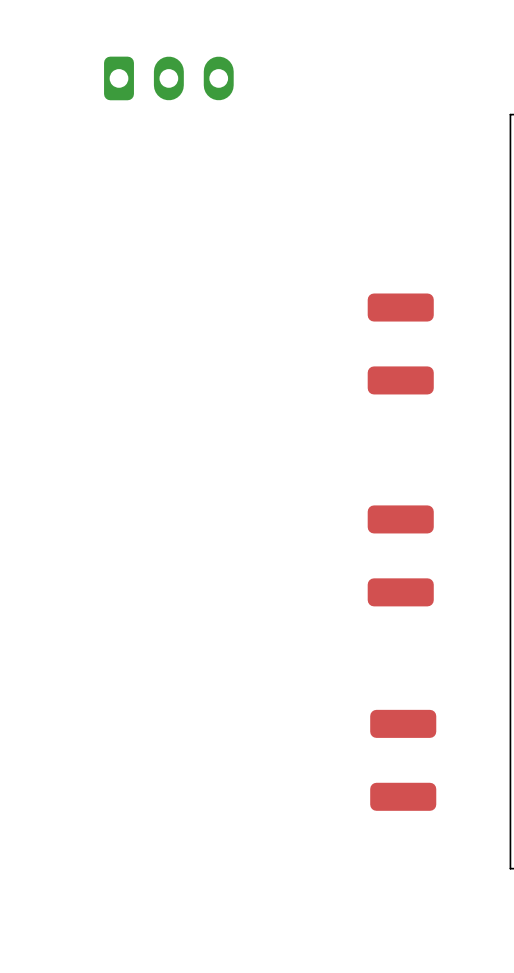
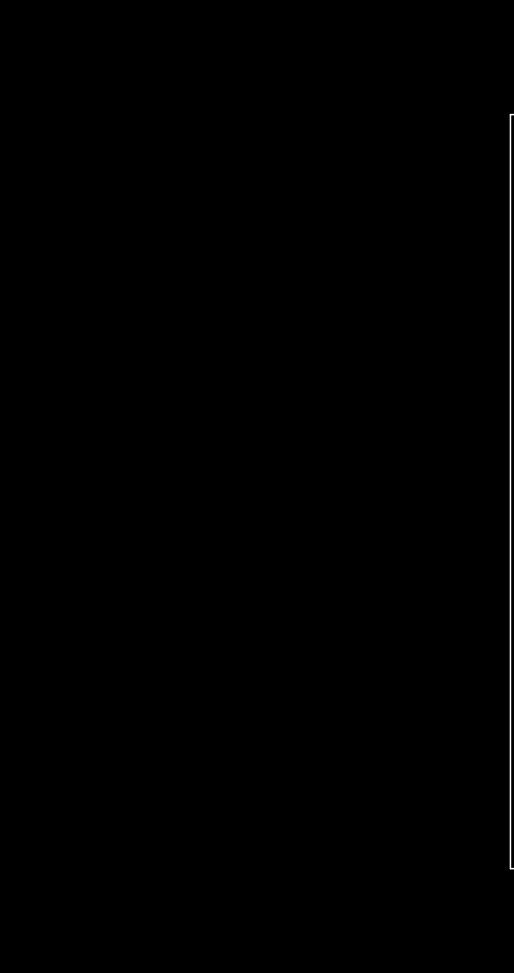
part: (168, 78) -> none
part: (400, 343) -> none
part: (400, 555) -> none
part: (403, 760) -> none

